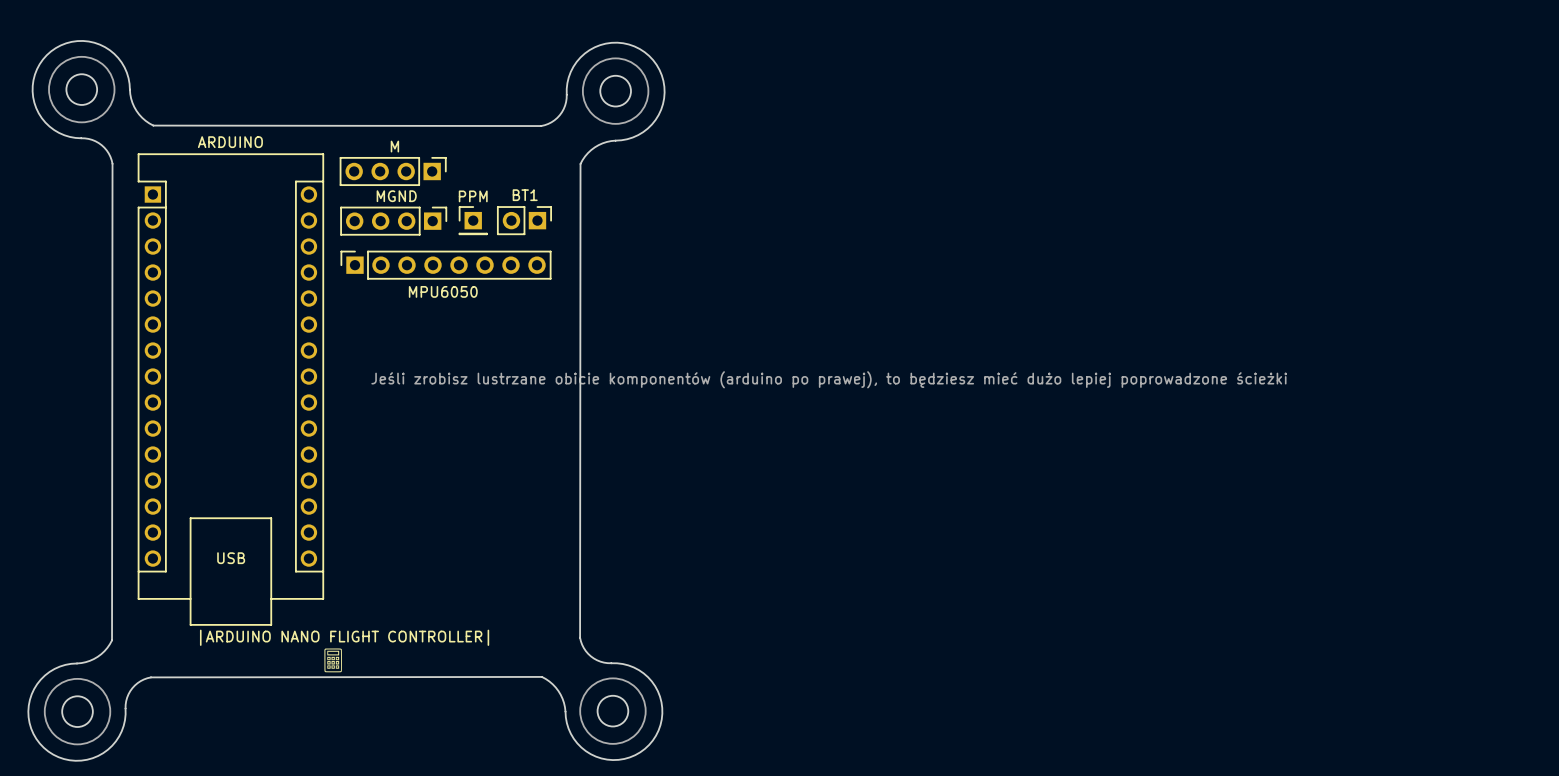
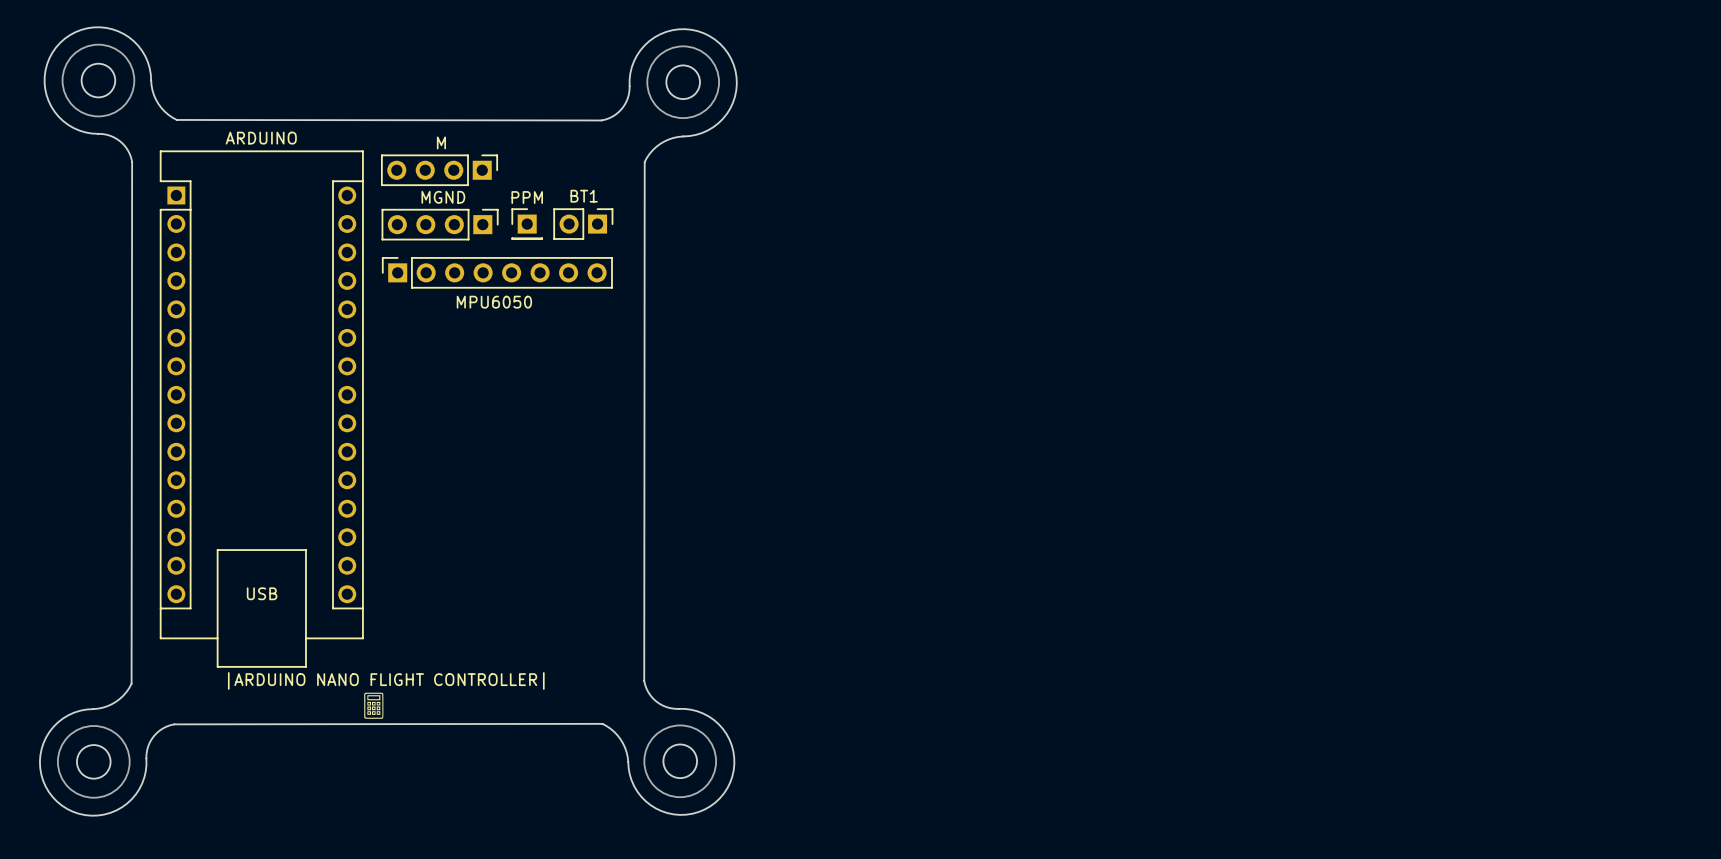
text: Jeśli zrobisz lustrzane obicie komponentów (arduino po prawej), to będziesz mieć dużo lepiej poprowadzone ścieżki (829, 379) -> none

